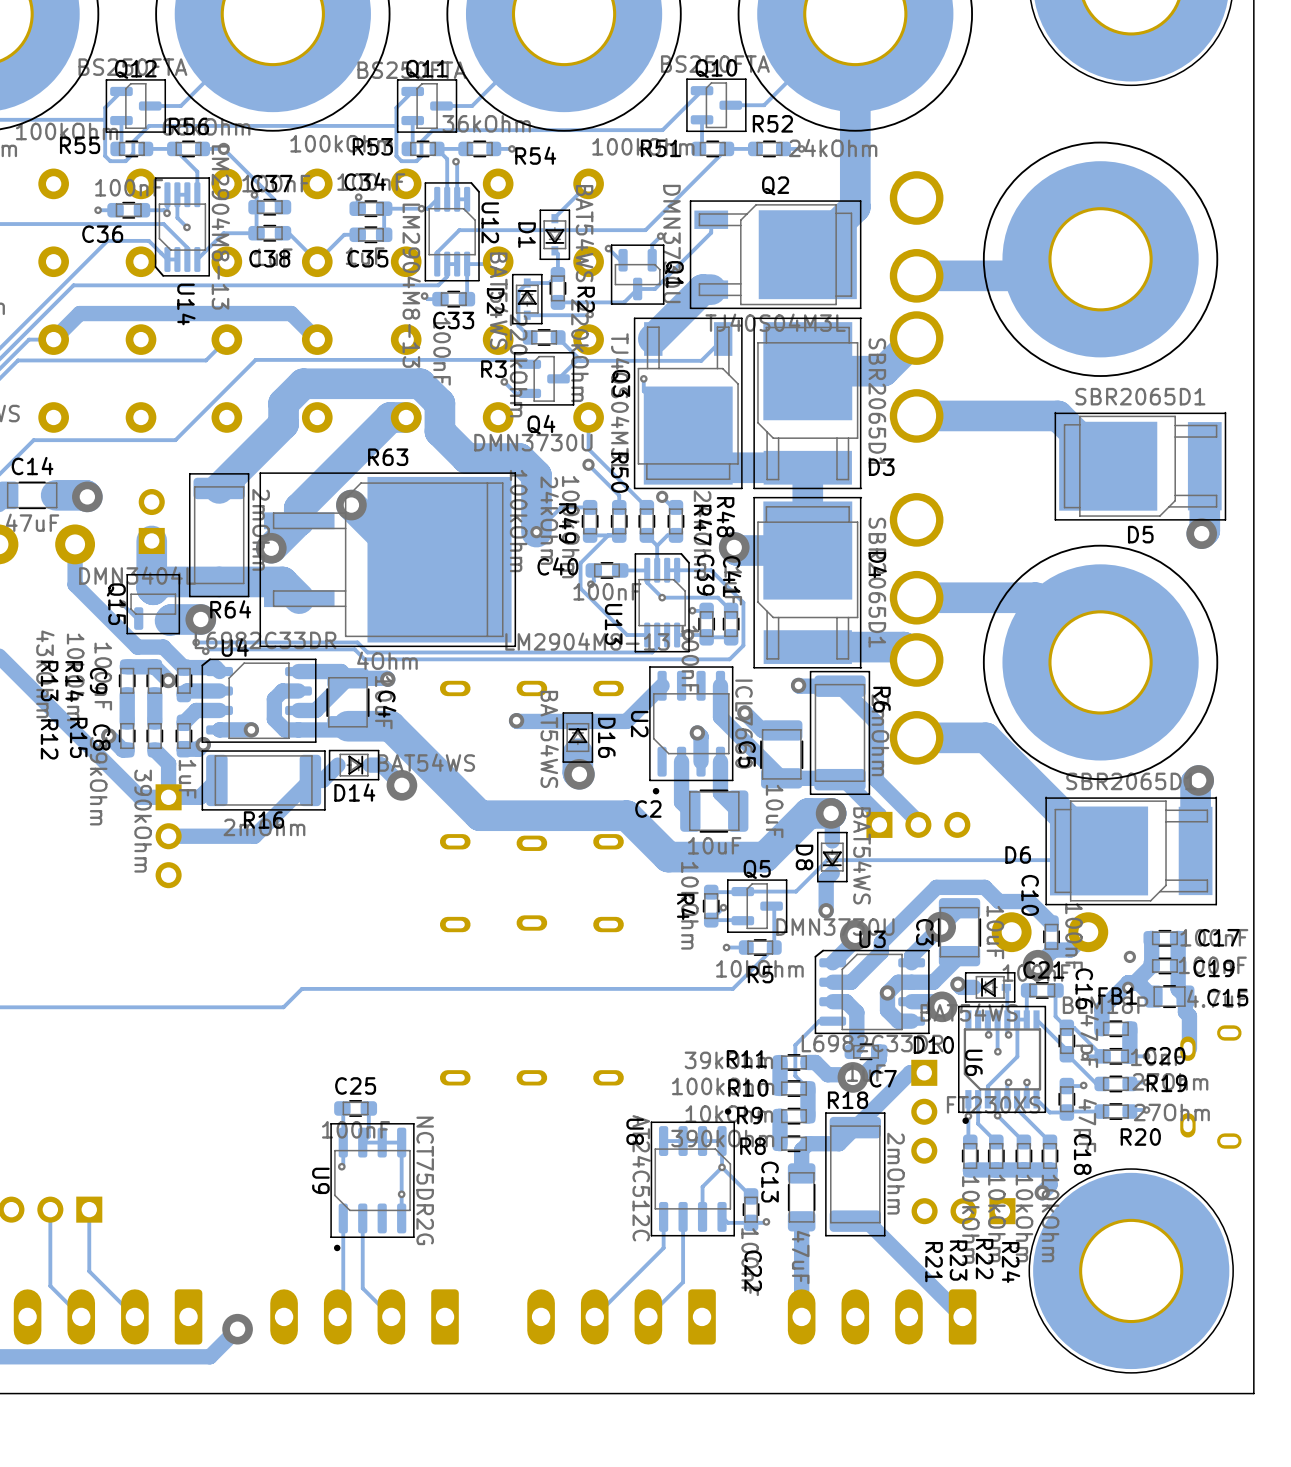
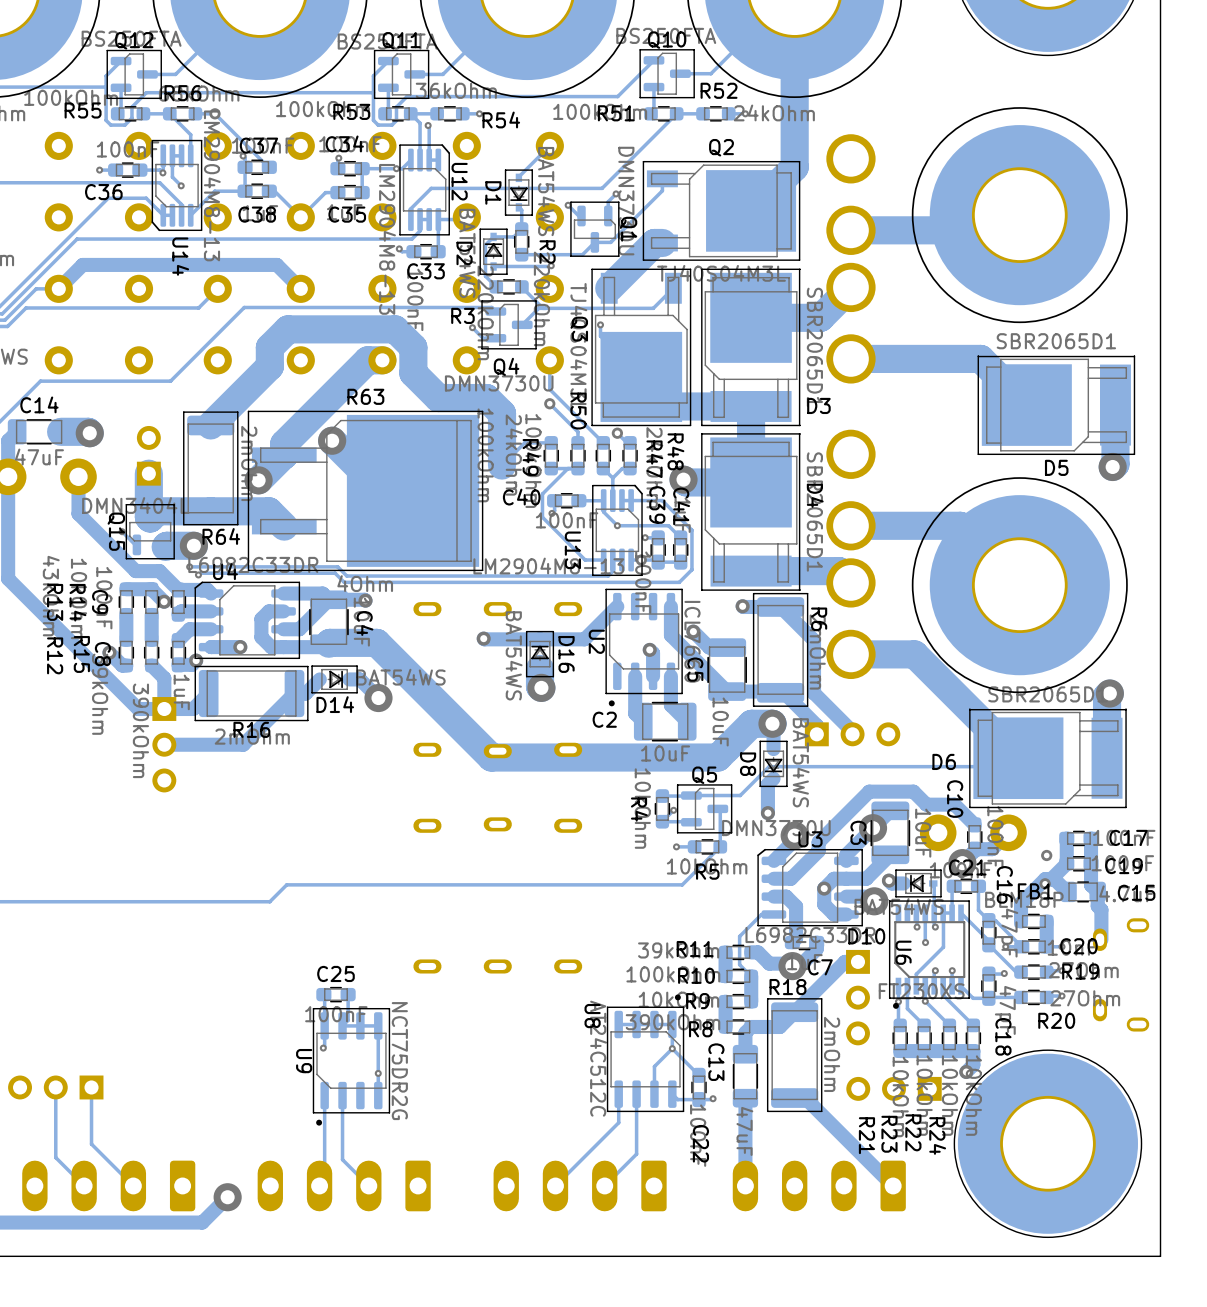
via: (536, 532) -> none
track: (347, 726) (390, 726) (479, 815) (626, 815) (668, 857) (764, 857) (771, 850) -> (328, 643) (376, 642) (491, 757) (717, 757)

